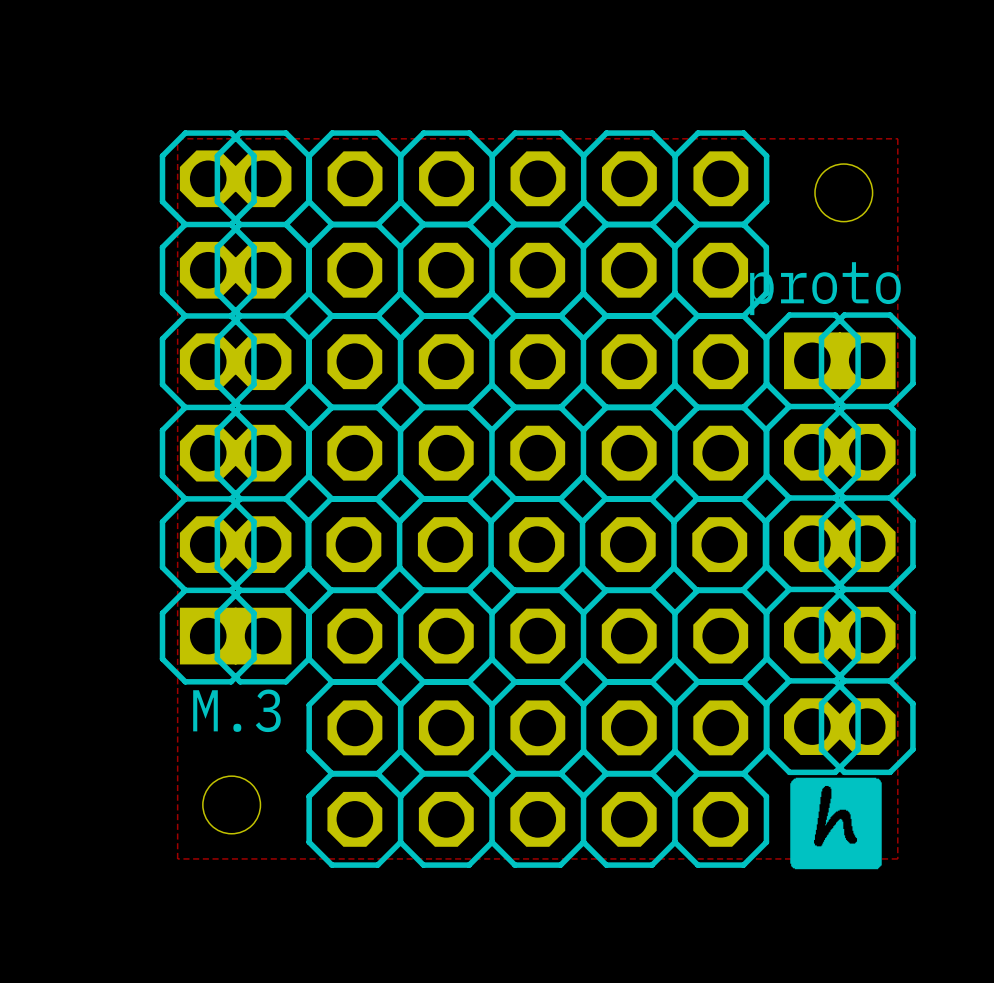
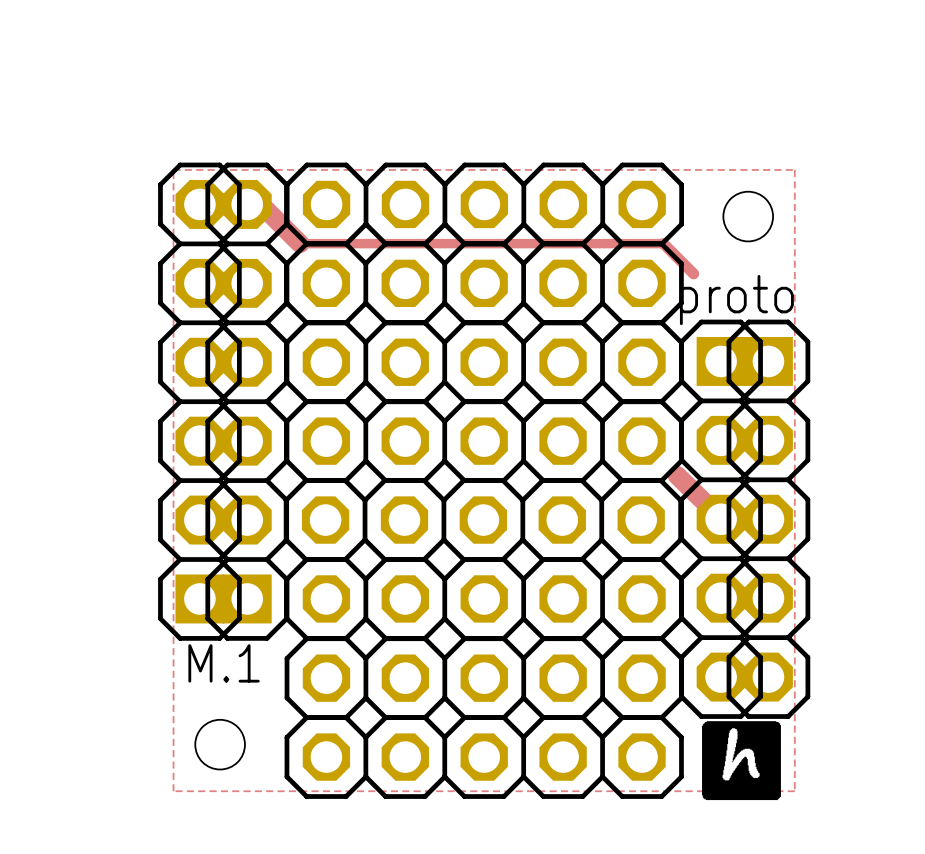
track: none -> (247, 204) (263, 207) (300, 243) (663, 243) (693, 273)
track: none -> (677, 475) (721, 518)
text: M.3 (236, 710) -> M.1 (224, 663)

